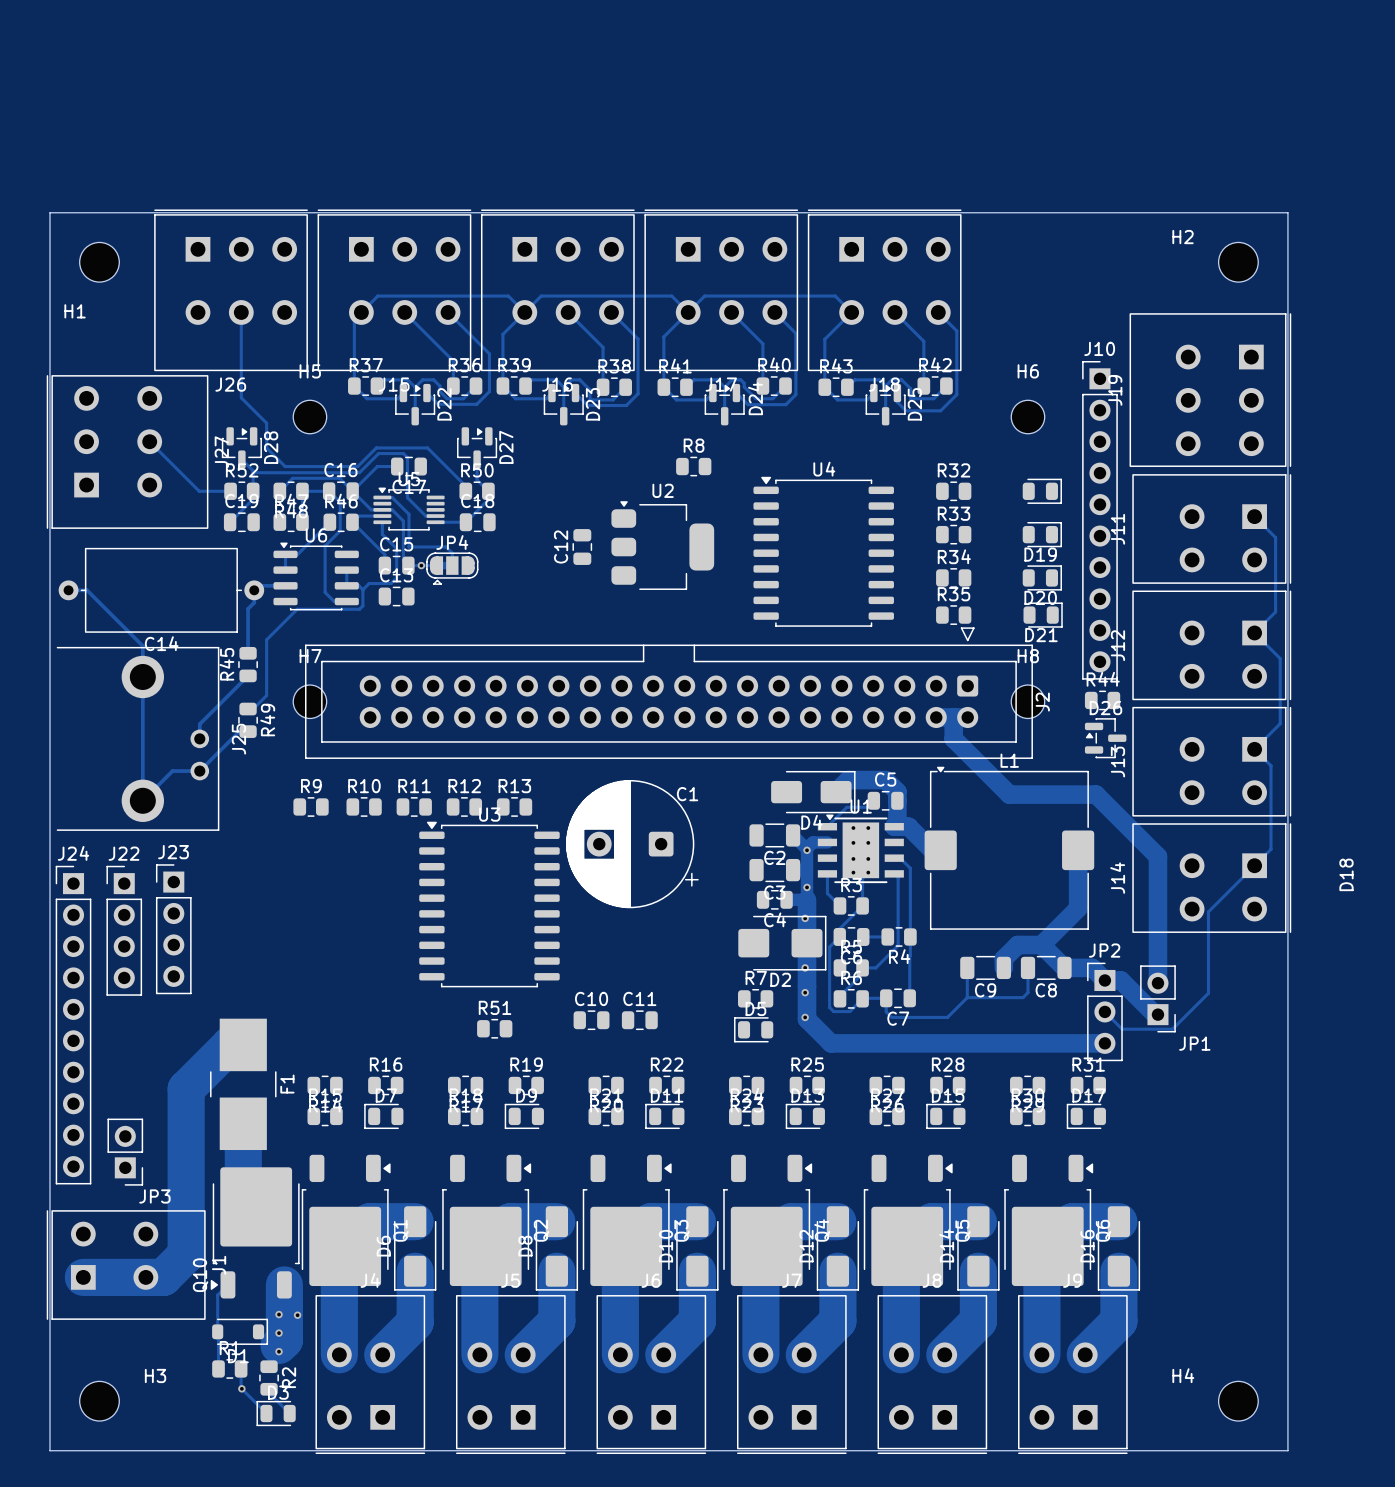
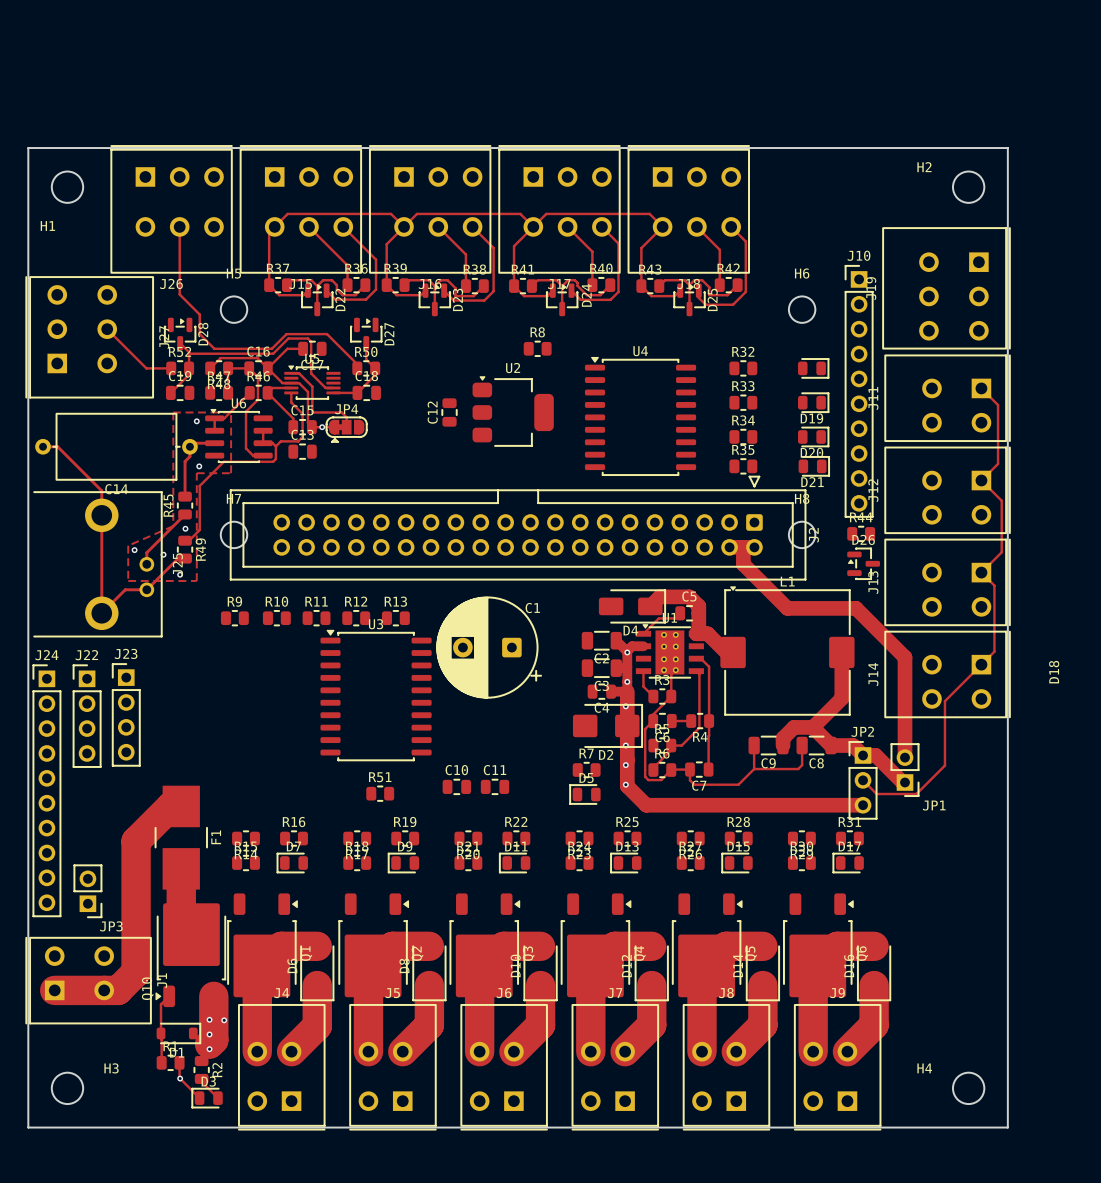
zone outline: none -> (173, 412) (231, 412) (231, 473) (196, 473) (196, 580) (128, 580) (128, 545) (173, 526) (173, 412)
via: none -> (196, 421)
via: none -> (199, 466)
via: none -> (185, 528)
via: none -> (134, 550)
via: none -> (163, 554)
via: none -> (180, 574)

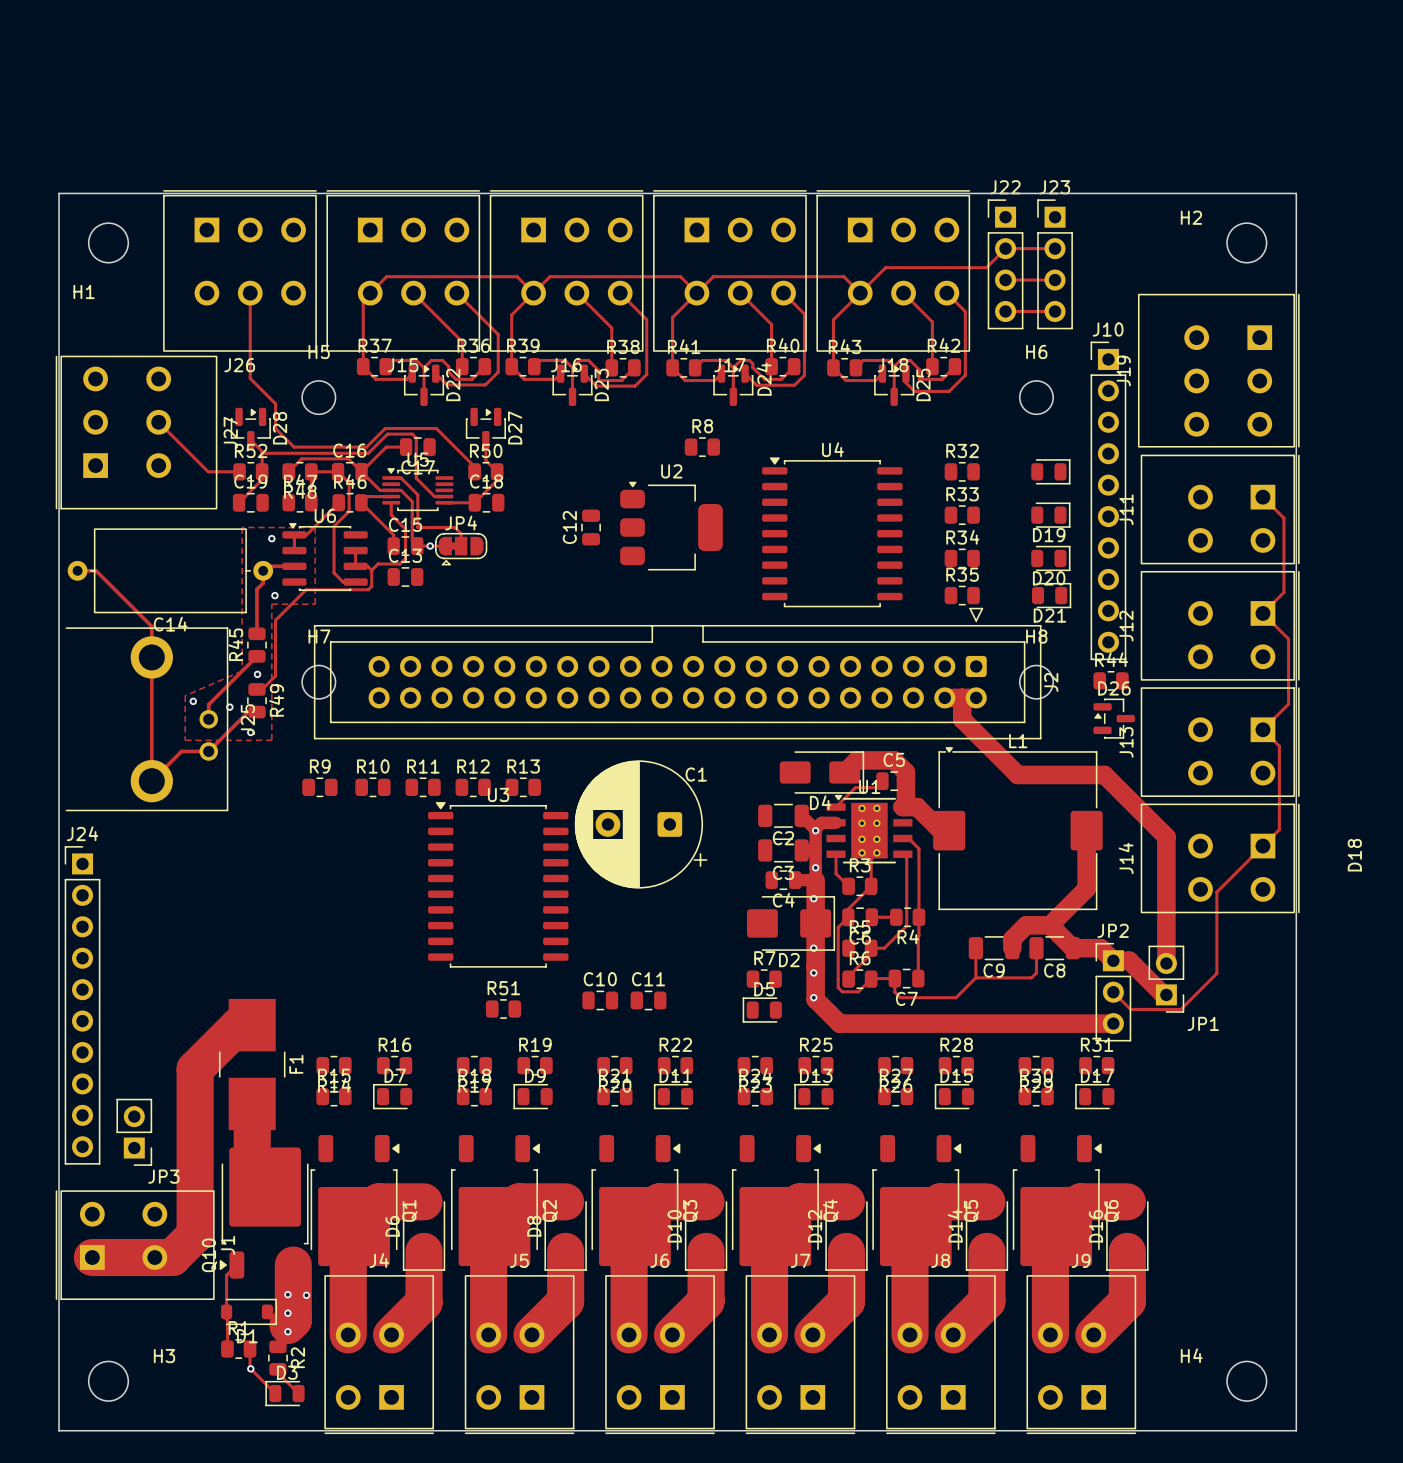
track: none -> (1055, 248) (1005, 248) (986, 267) (885, 267) (860, 293)
track: none -> (1005, 280) (1055, 280)
track: none -> (1005, 311) (1055, 311)
J23 position: (126, 714) -> (1055, 264)
J22 position: (87, 716) -> (1005, 264)

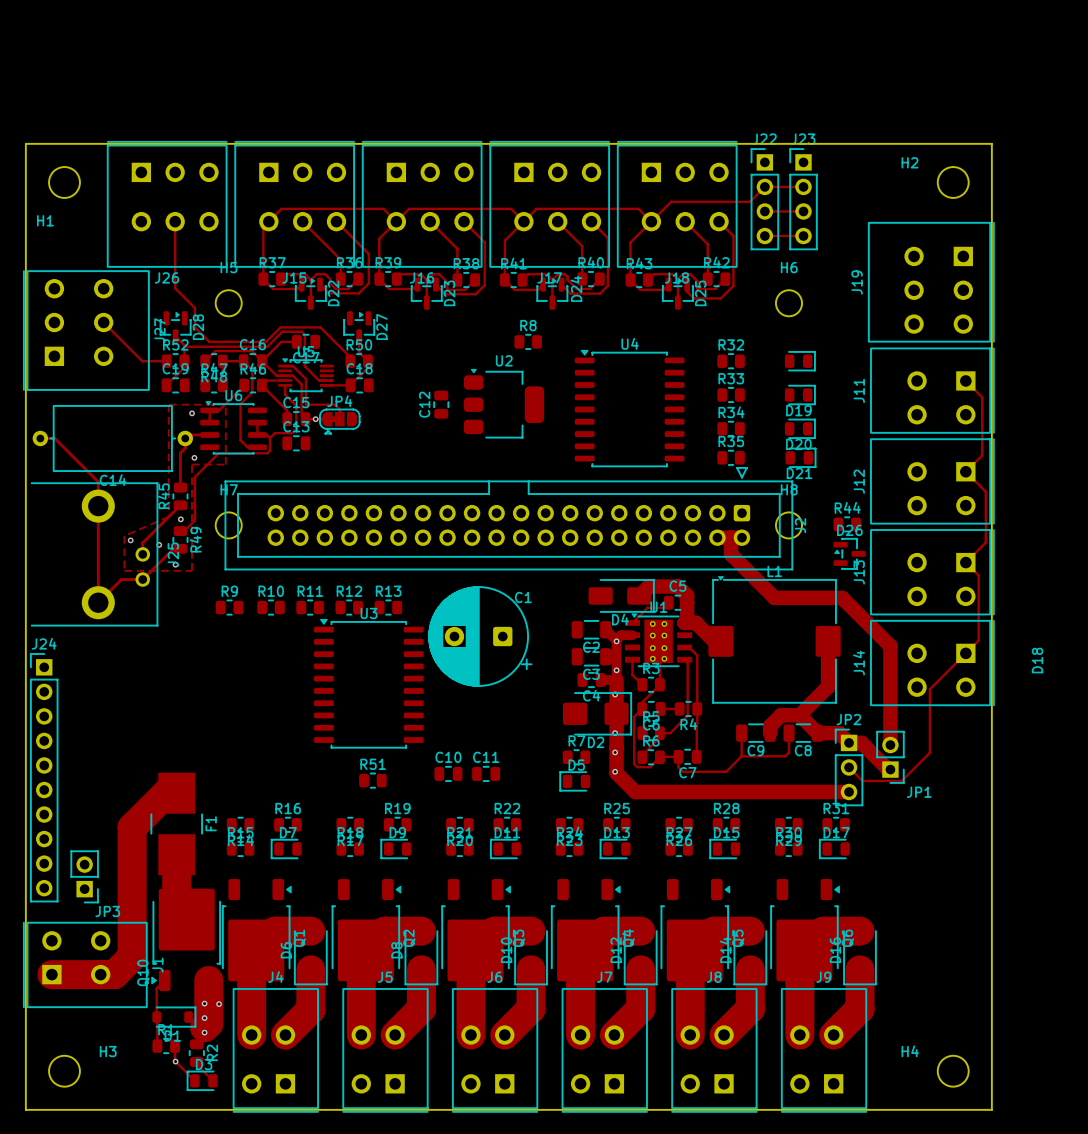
J10: (1108, 500) -> none

